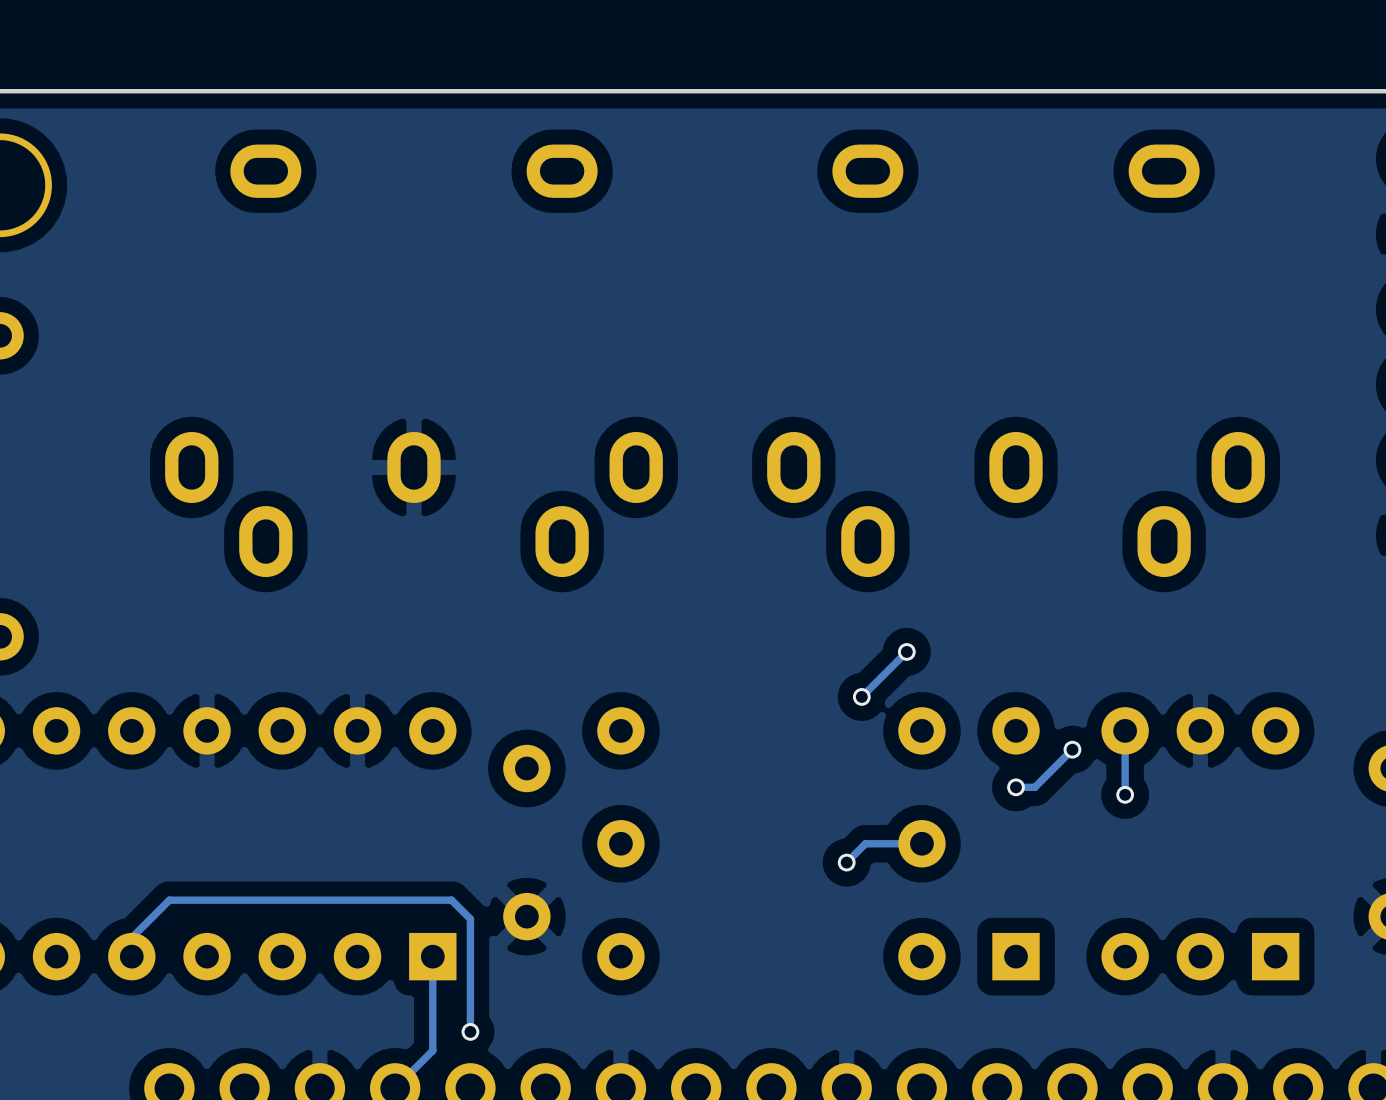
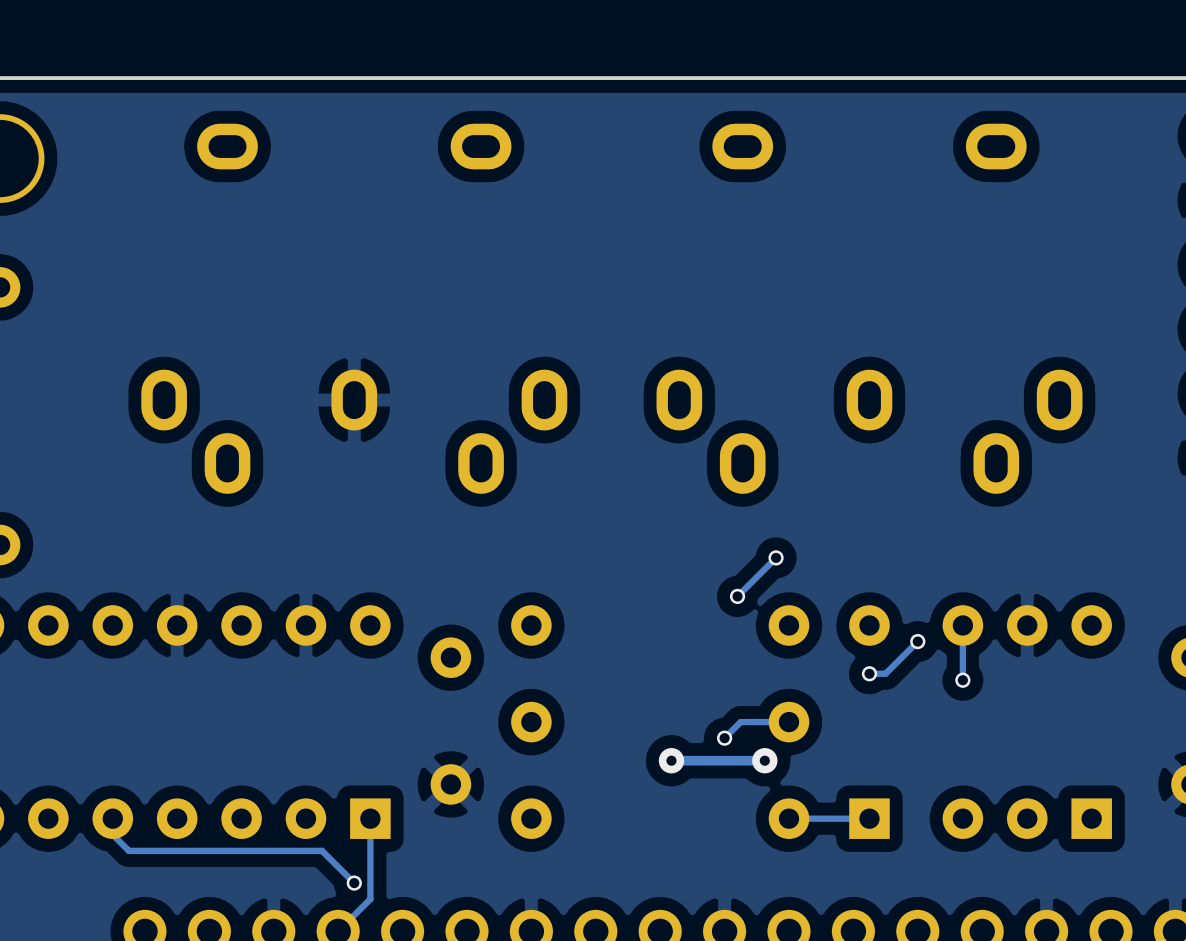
via: none -> (671, 760)
track: none -> (764, 760) (671, 760)
via: none -> (764, 760)
track: (131, 956) (131, 937) (169, 900) (451, 900) (470, 919) (470, 1031) -> (112, 818) (112, 834) (128, 850) (322, 850) (354, 883)
track: none -> (869, 818) (788, 818)
via position: (470, 1031) -> (354, 883)

